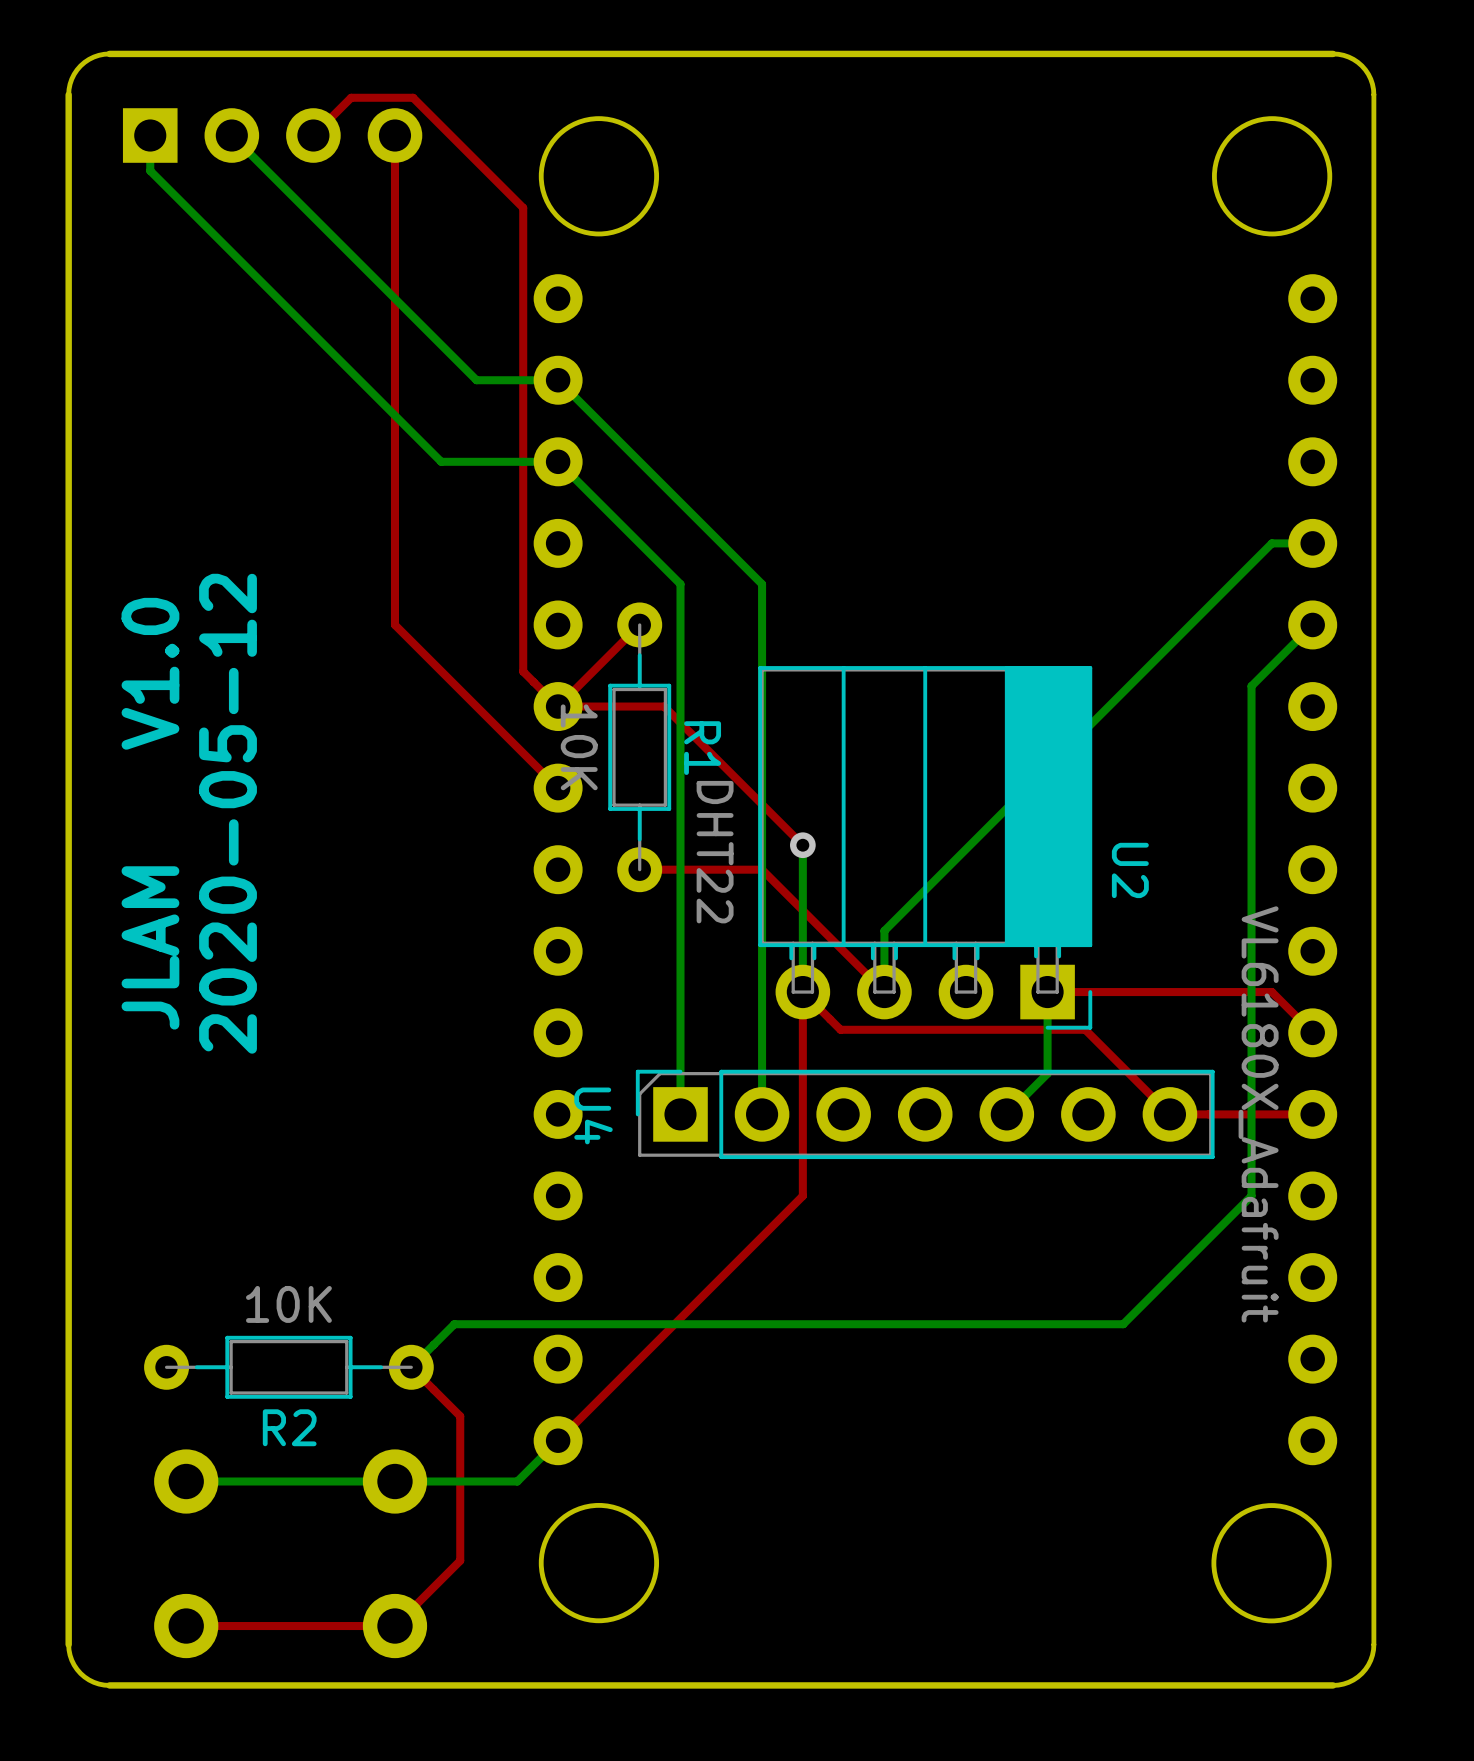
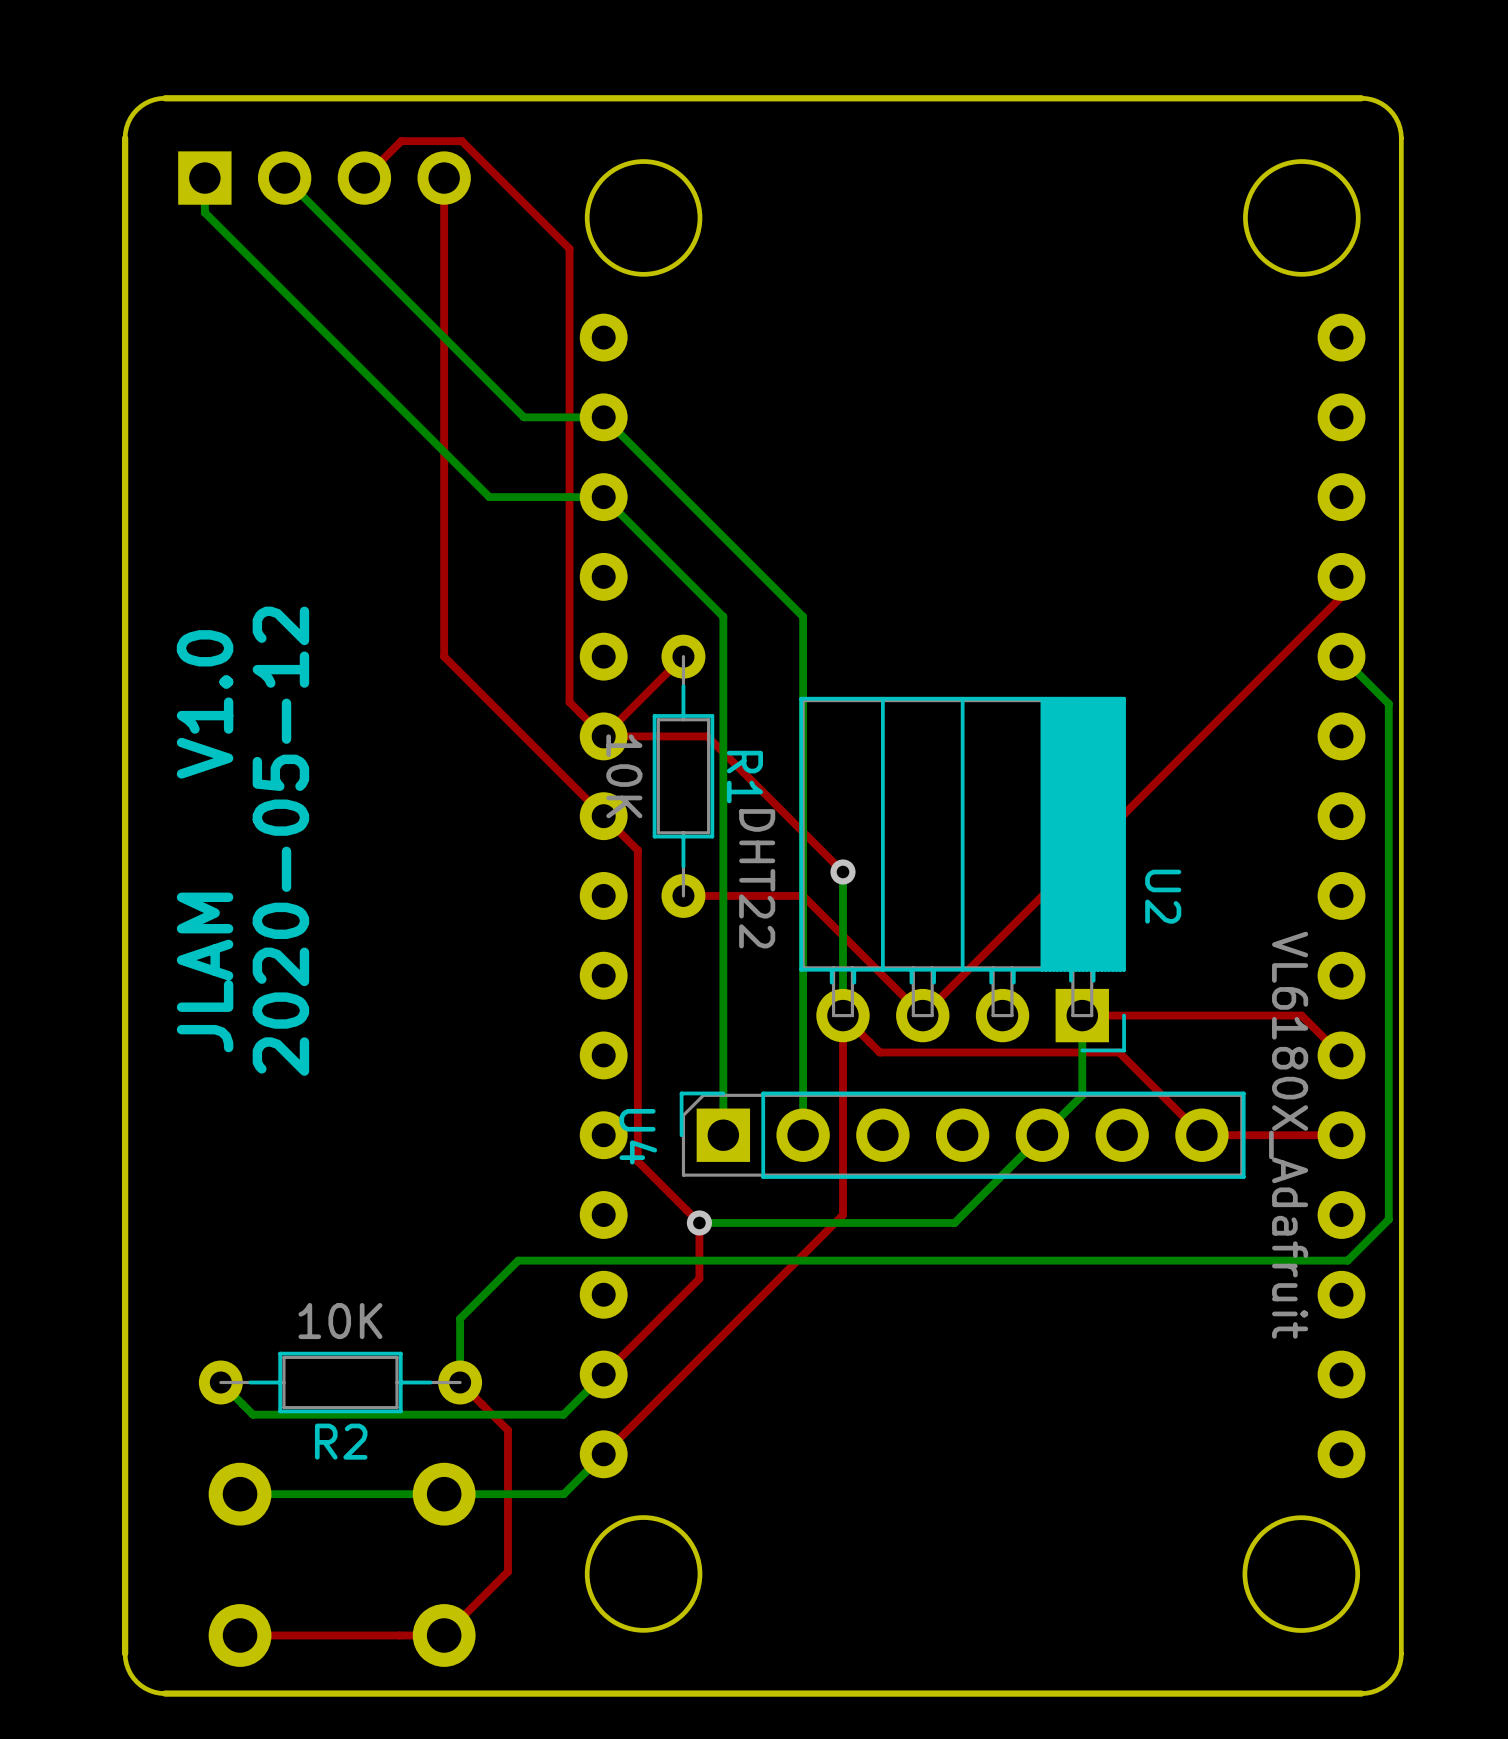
bottom track: (1312, 543) (1271, 543) (884, 930) (884, 992) -> none
top track: none -> (1341, 576) (1341, 596) (922, 1015)
bottom track: (1312, 624) (1251, 686) (1251, 1195) (1123, 1324) (454, 1324) (411, 1367) -> (1341, 656) (1388, 703) (1388, 1219) (1347, 1260) (518, 1260) (460, 1318) (460, 1382)
top track: none -> (603, 816) (637, 850) (637, 1161) (699, 1222) (699, 1278) (603, 1374)
bottom track: none -> (1042, 1135) (954, 1222) (699, 1222)
via: none -> (699, 1222)
bottom track: none -> (603, 1374) (563, 1414) (253, 1414) (220, 1382)

